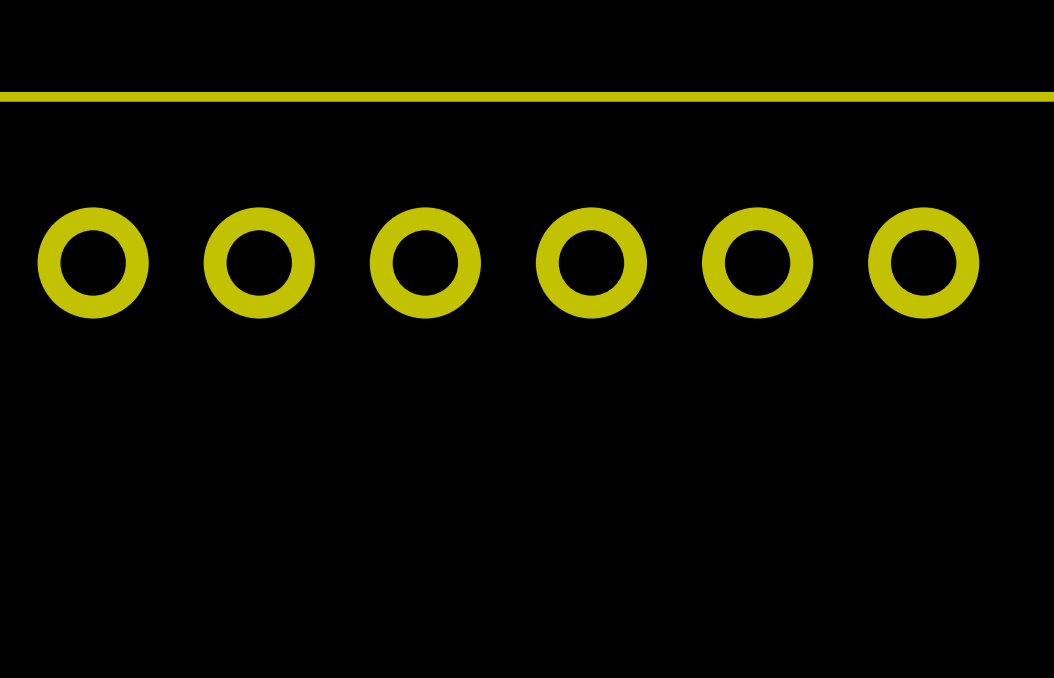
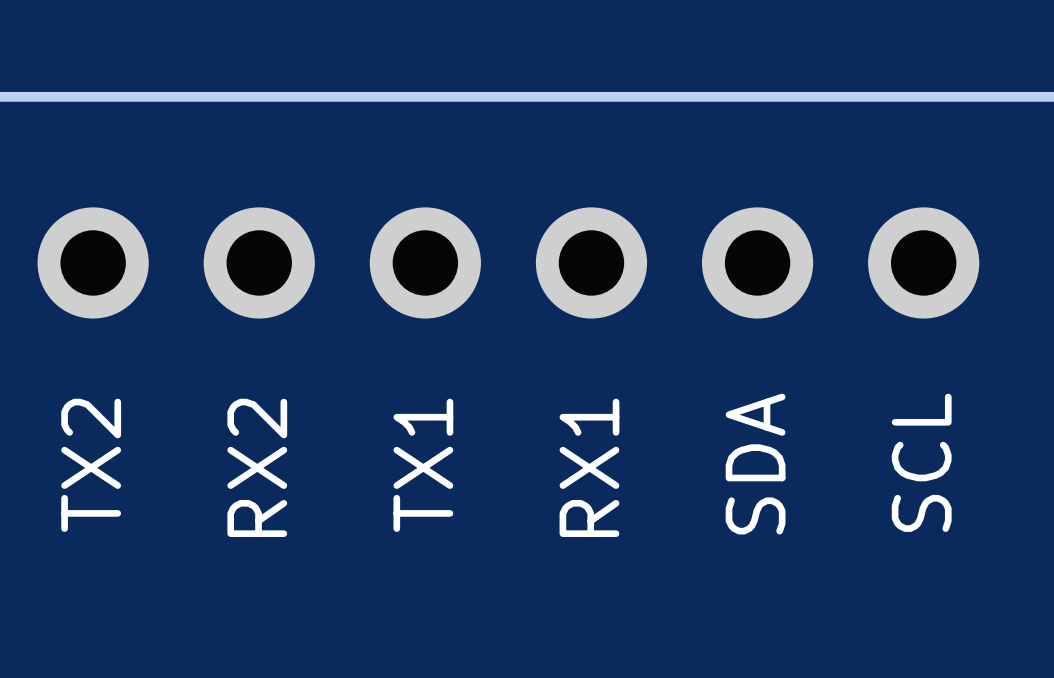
text: none -> TX2 (91, 465)
text: none -> TX1 (423, 465)
text: none -> RX2 (257, 467)
text: none -> RX1 (589, 467)
text: none -> SCL (921, 462)
text: none -> SDA (755, 464)

